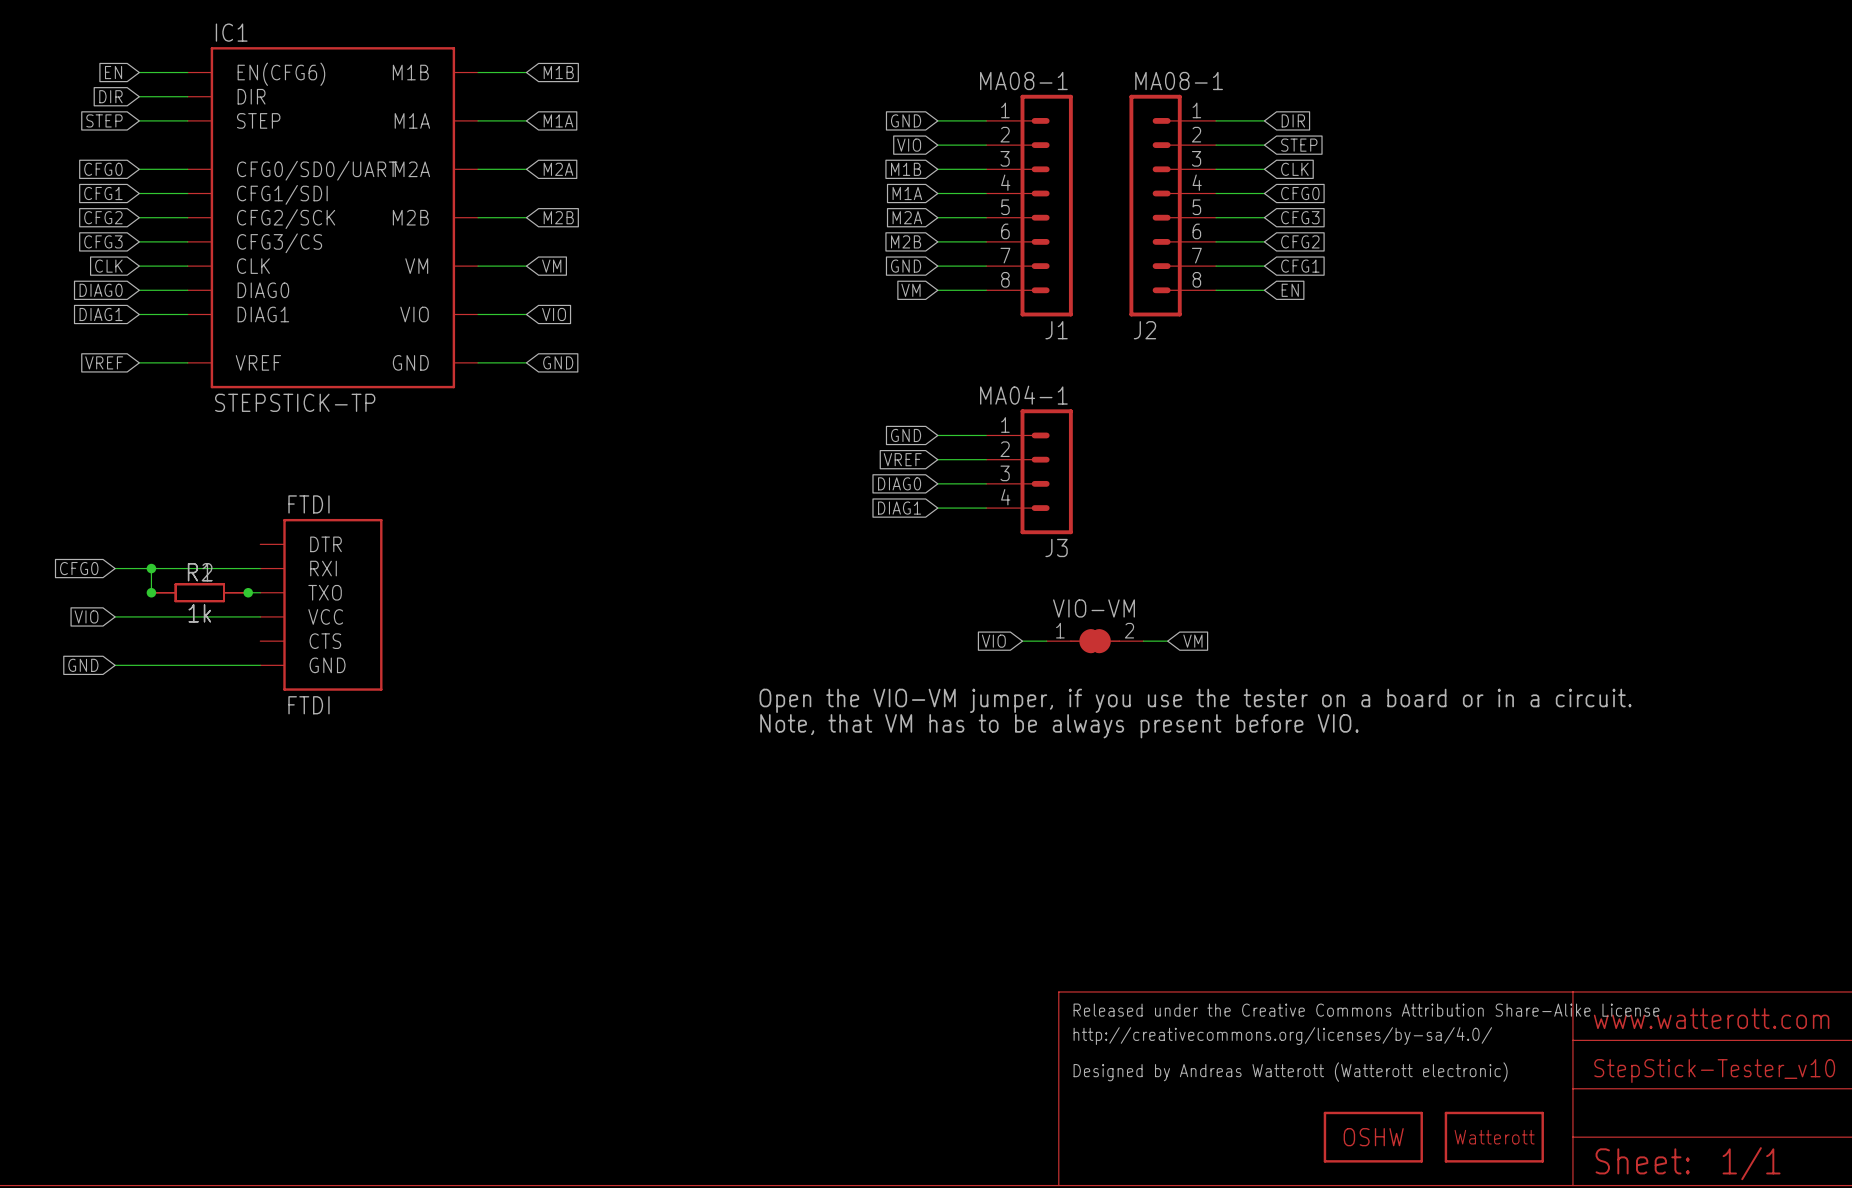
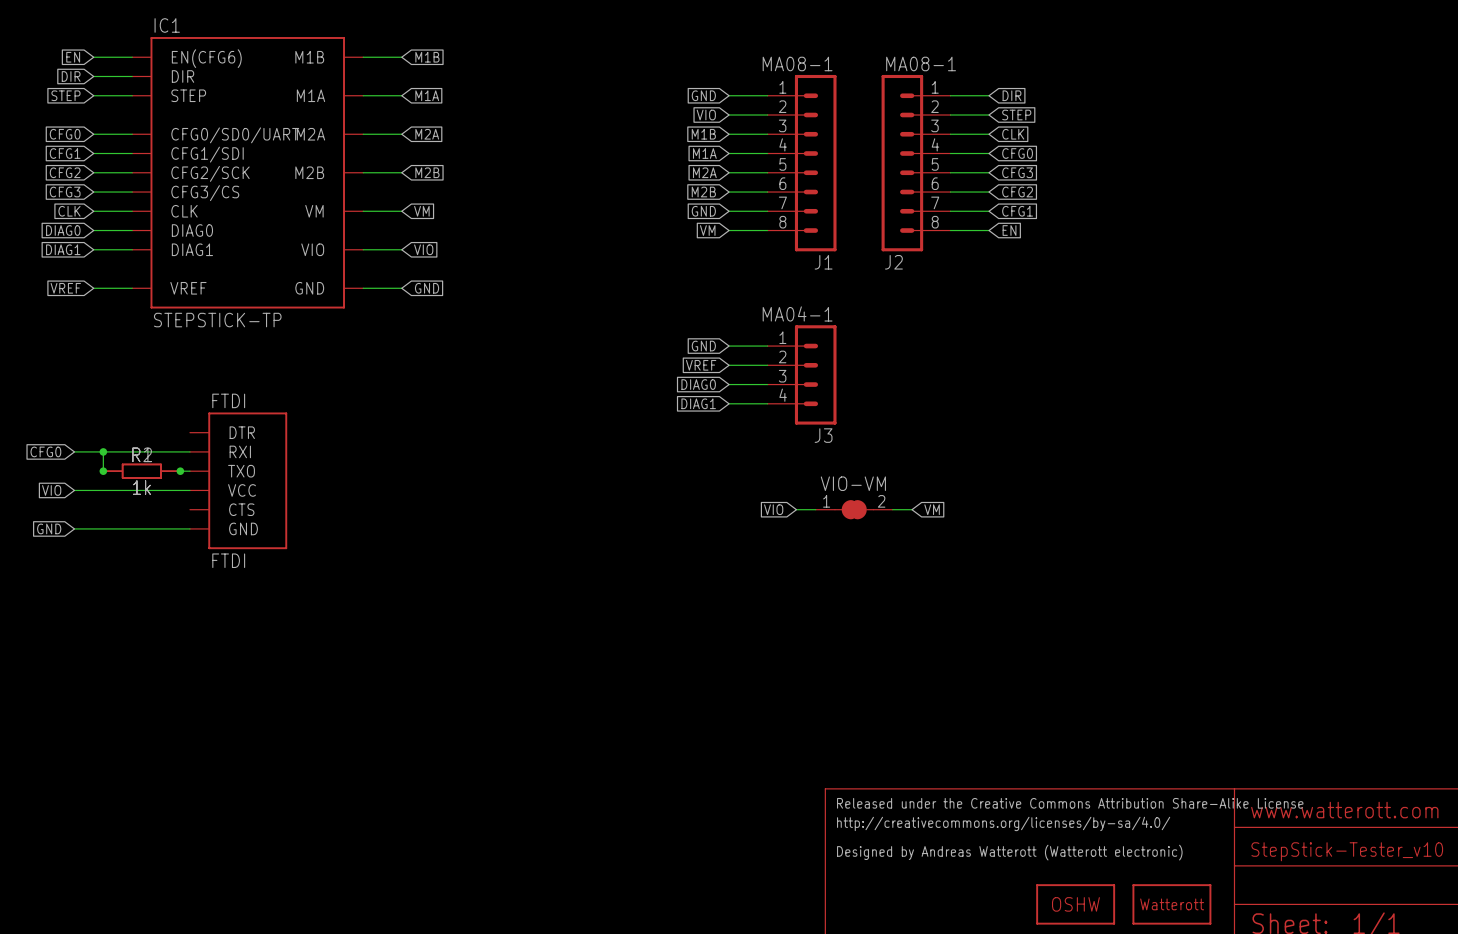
text: Open the VIO-VM jumper, if you use the tester on a board or in a circuit. (1195, 700) -> none
text: Note, that VM has to be always present before VIO. (1059, 726) -> none

